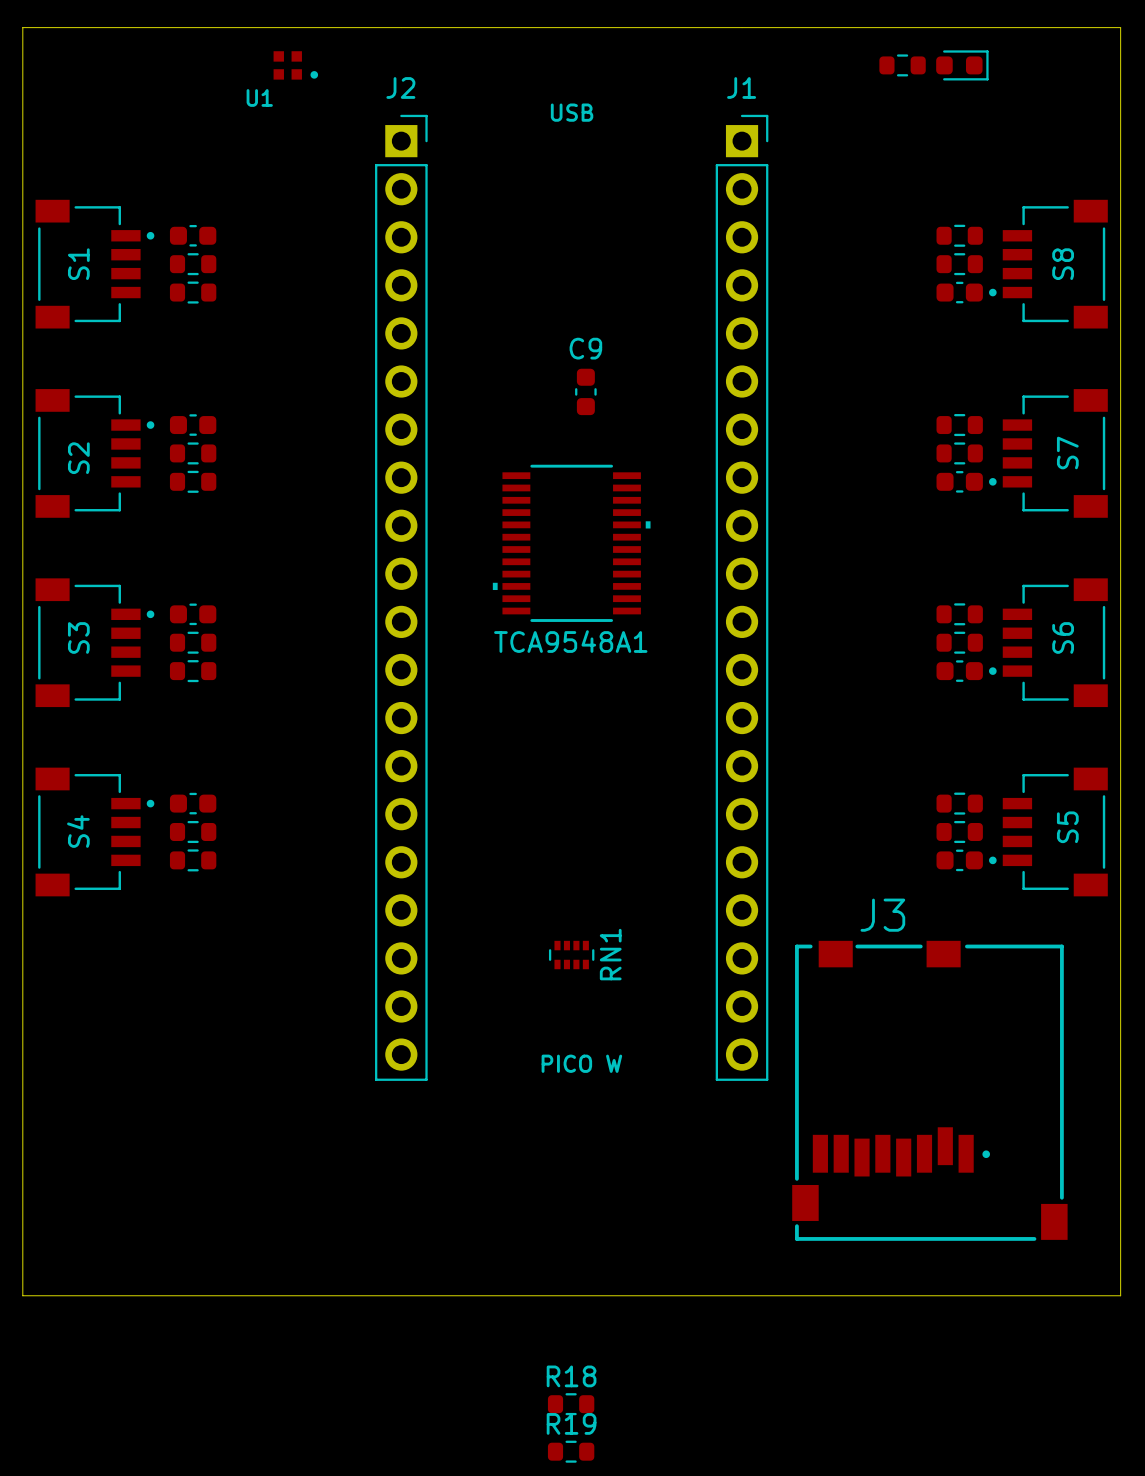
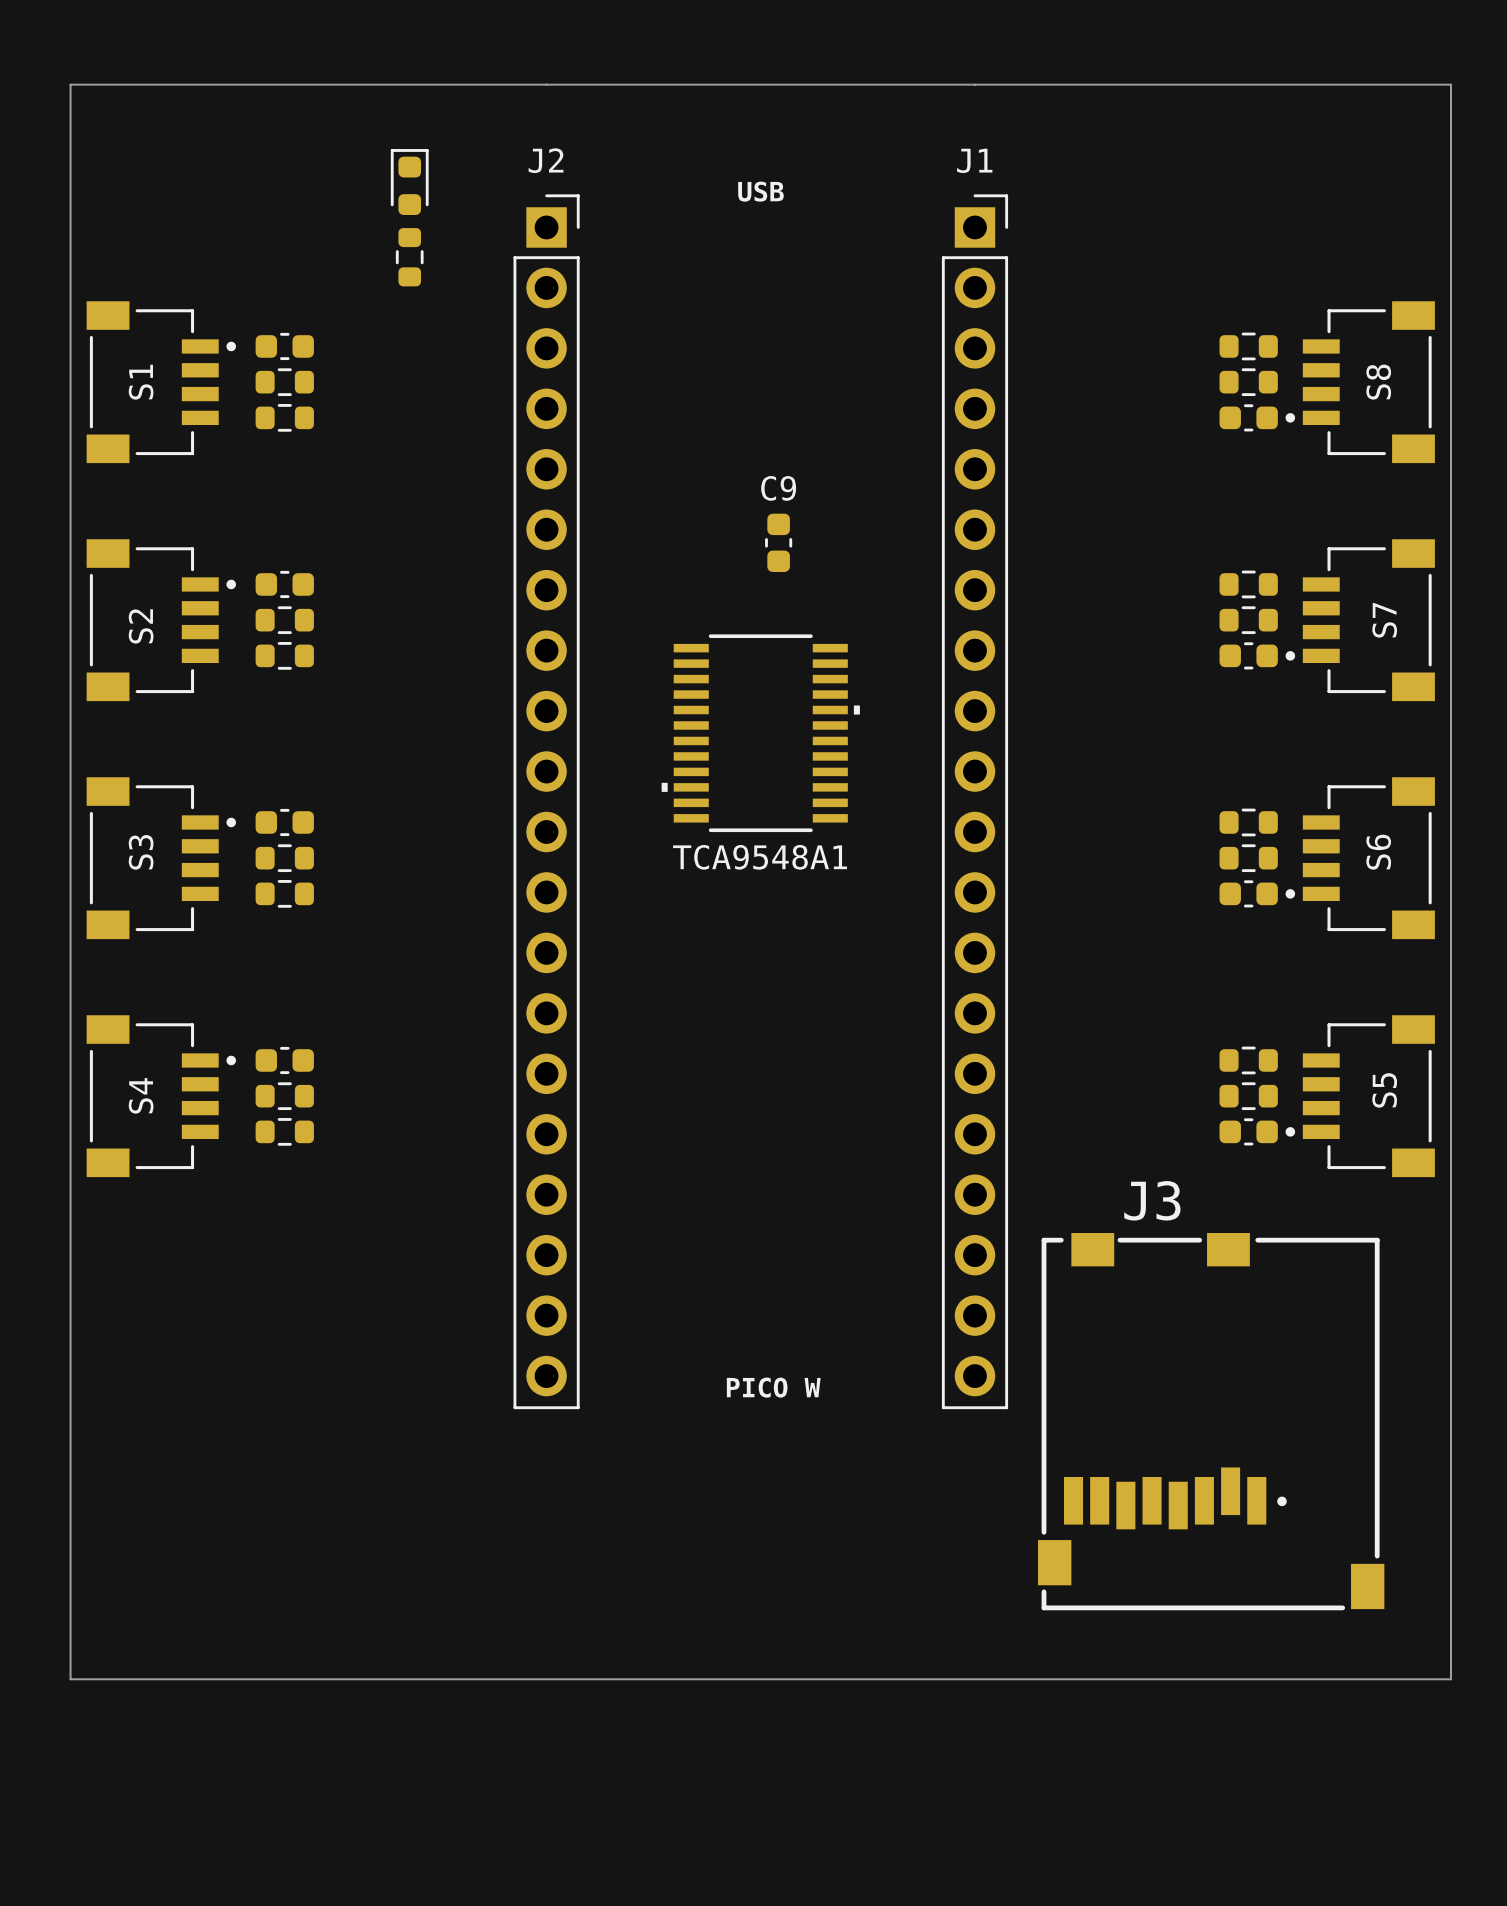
U1: (295, 65) -> none
part: (902, 65) -> none
part: (962, 65) -> none
part: none -> (409, 182)
part: none -> (409, 257)
RN1: (571, 955) -> none
R18: (571, 1404) -> none
R19: (571, 1451) -> none

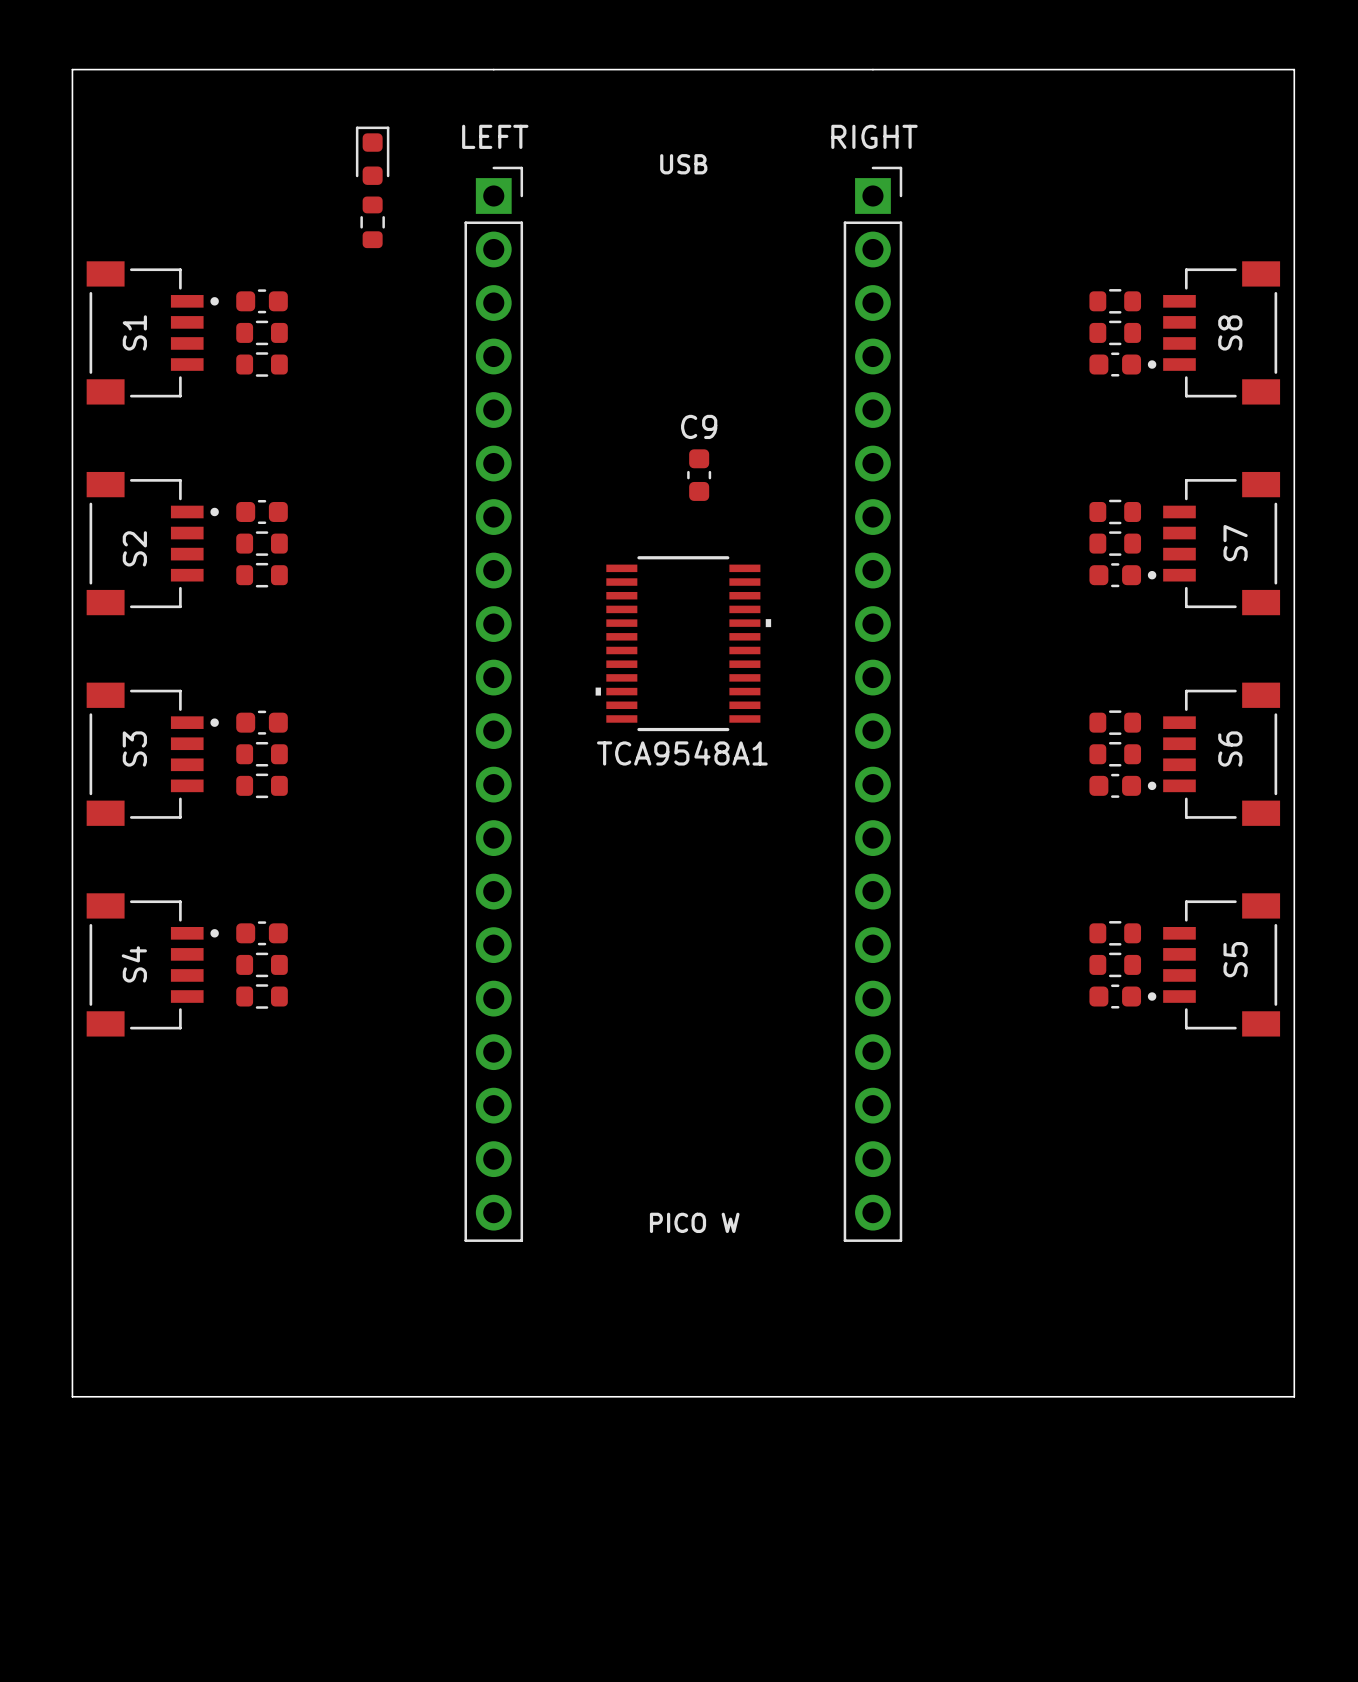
J2 name: J2 (546, 160) -> LEFT (495, 136)
J1 name: J1 (974, 160) -> RIGHT (874, 136)
J3: (1211, 1421) -> none
board edge: (70, 1584) (70, 1679) (1450, 1679) (1450, 1584) -> (72, 1396) (1294, 1396)

